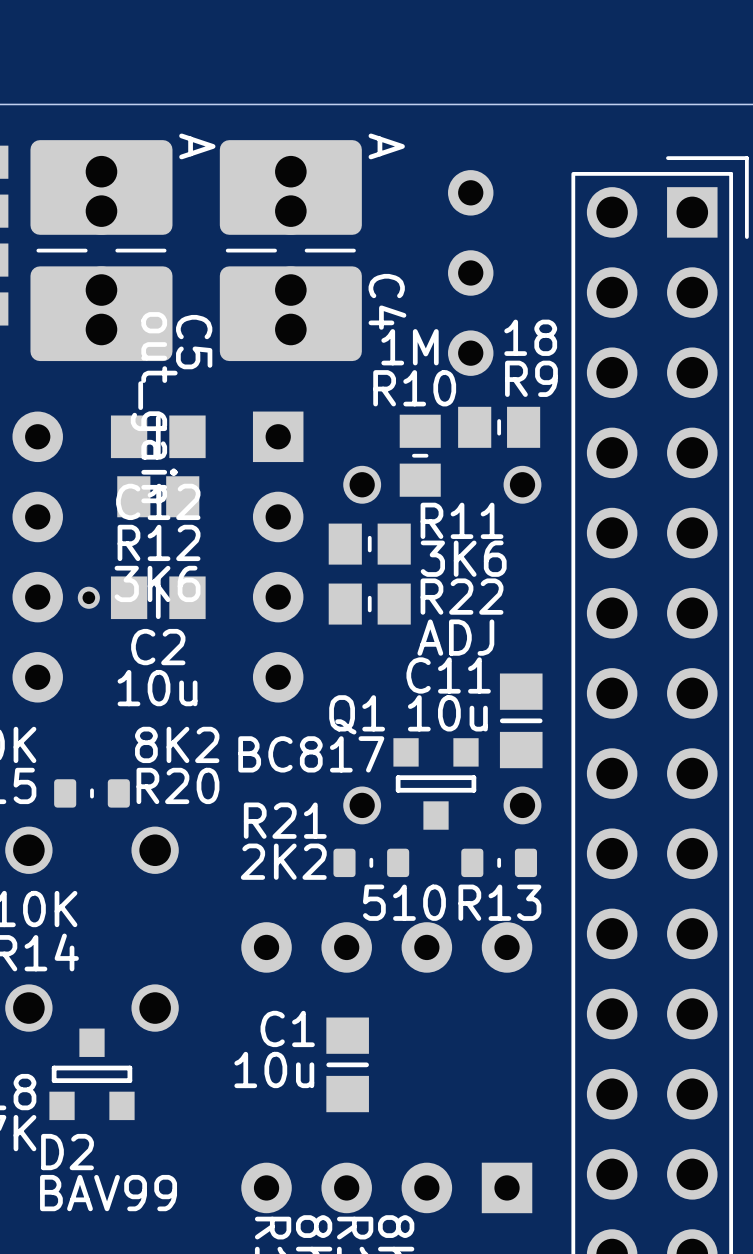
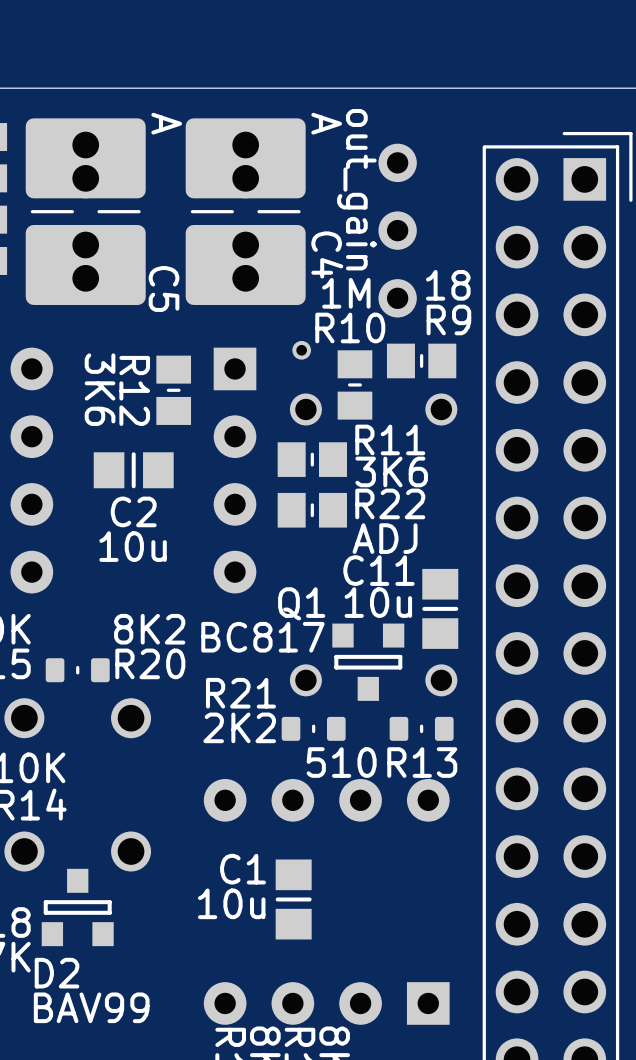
part: (158, 436) -> none
R12 rotation: 0° (158, 496) -> 90° clockwise (173, 390)
R12 position: (158, 496) -> (173, 390)
part position: (88, 597) -> (301, 350)
C2 position: (158, 597) -> (133, 470)

